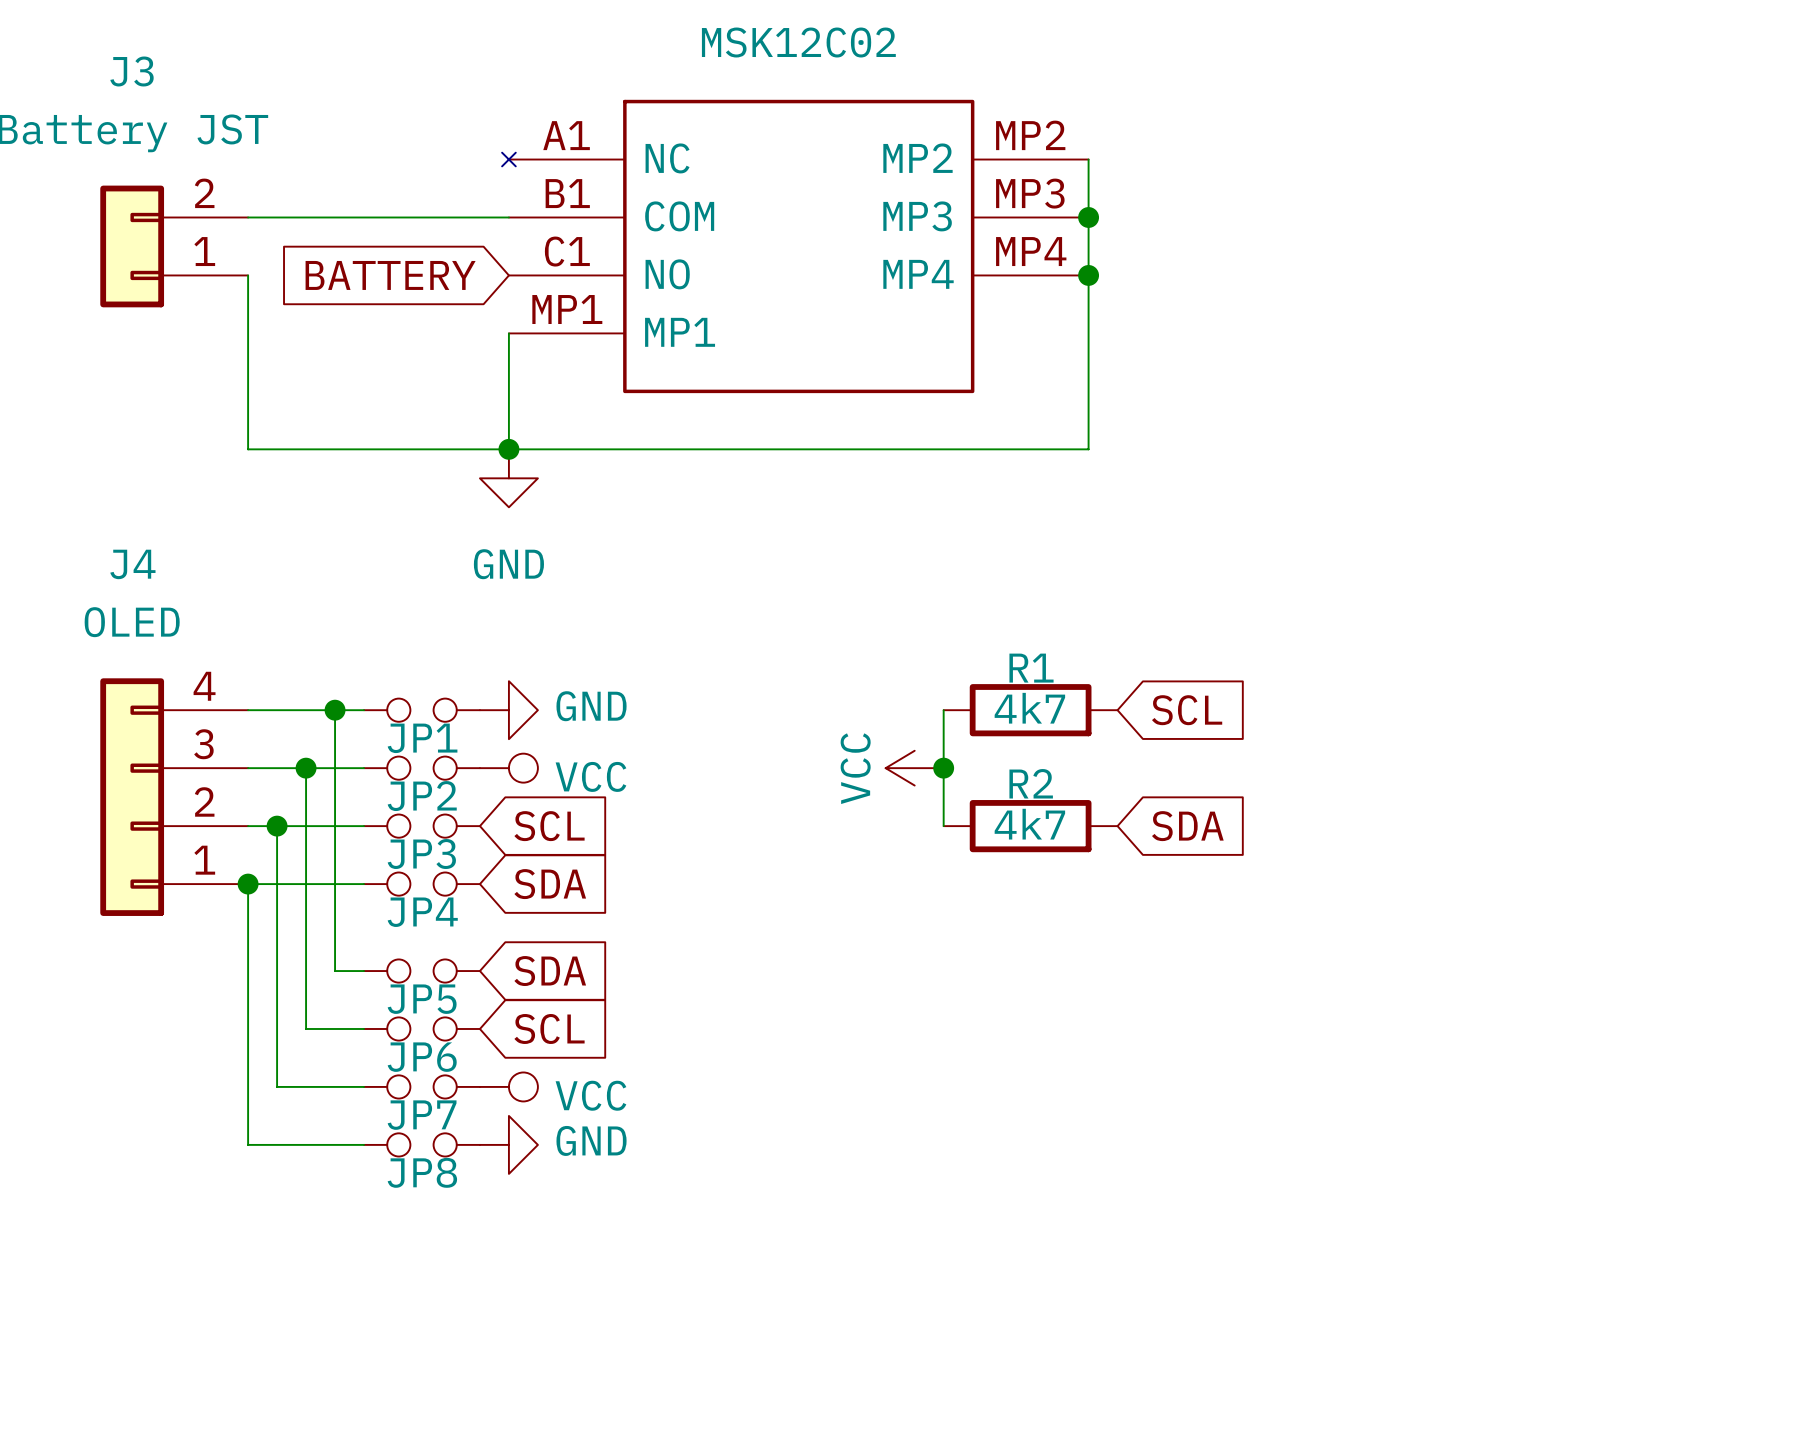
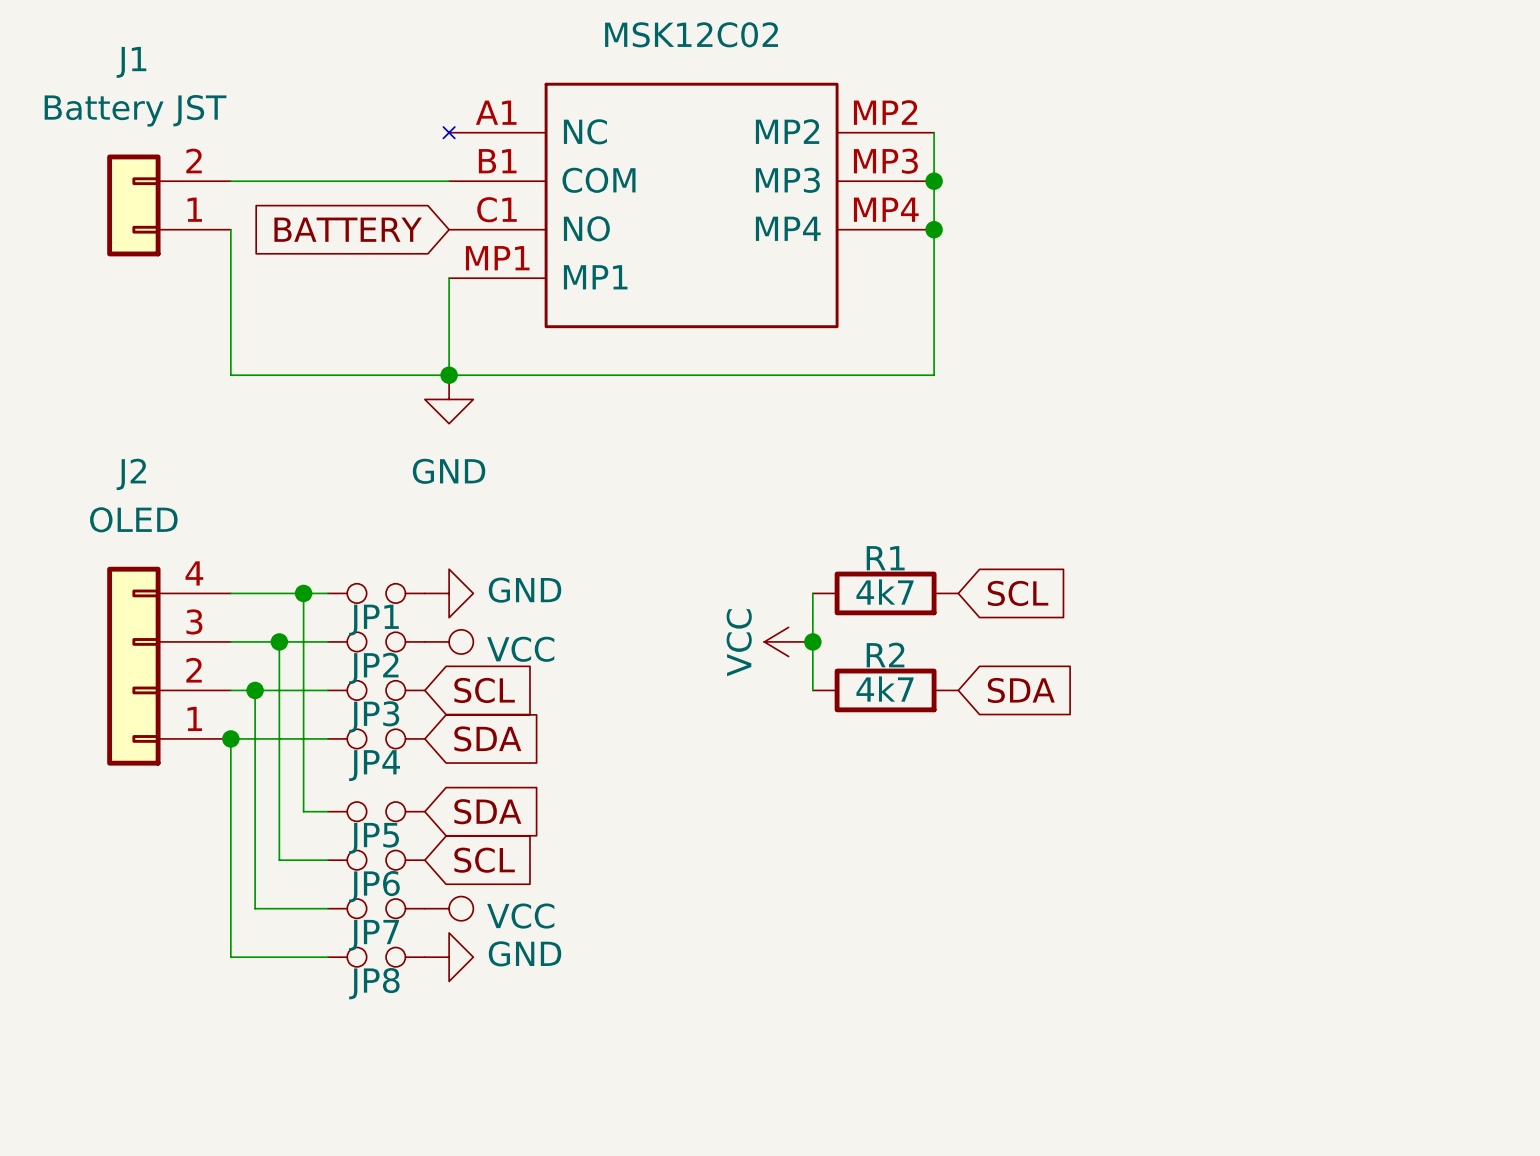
J3 name: J3 (132, 71) -> J1 (131, 62)
J4 name: J4 (132, 564) -> J2 (131, 474)

